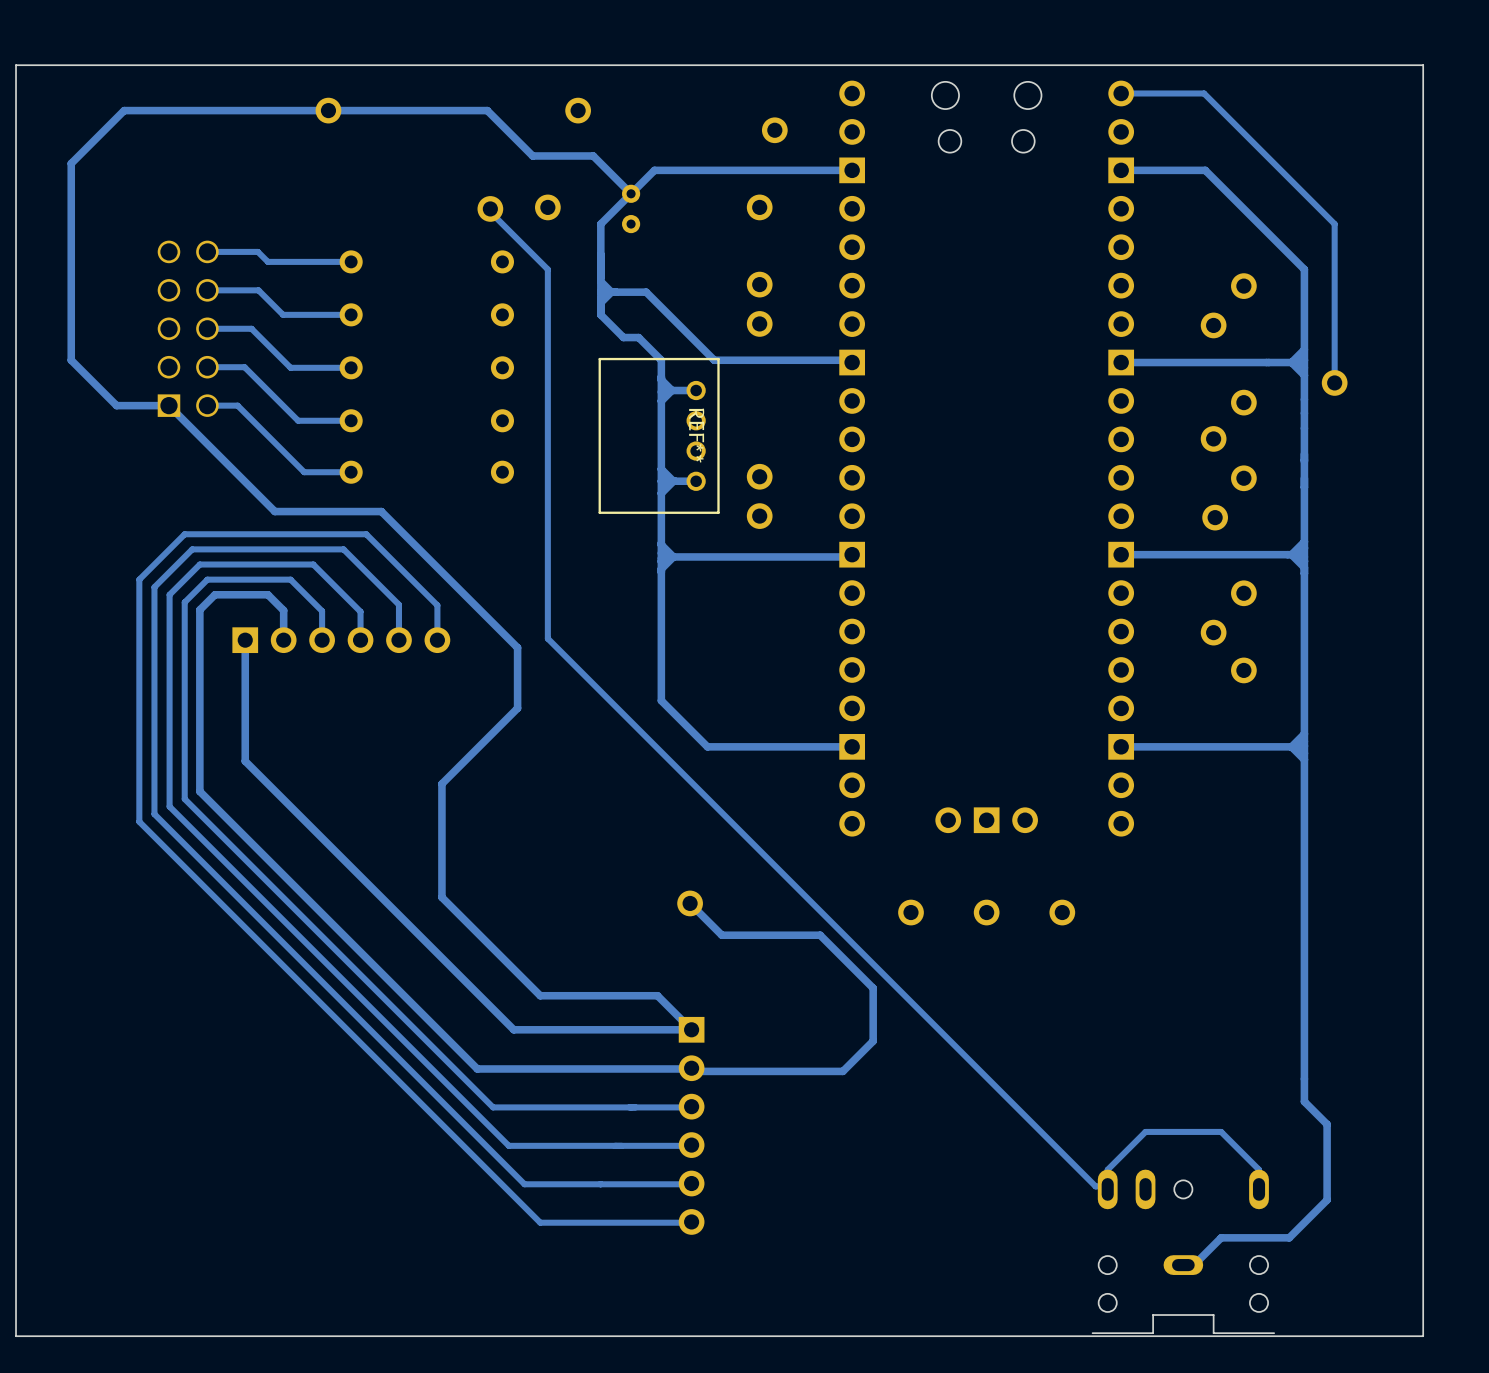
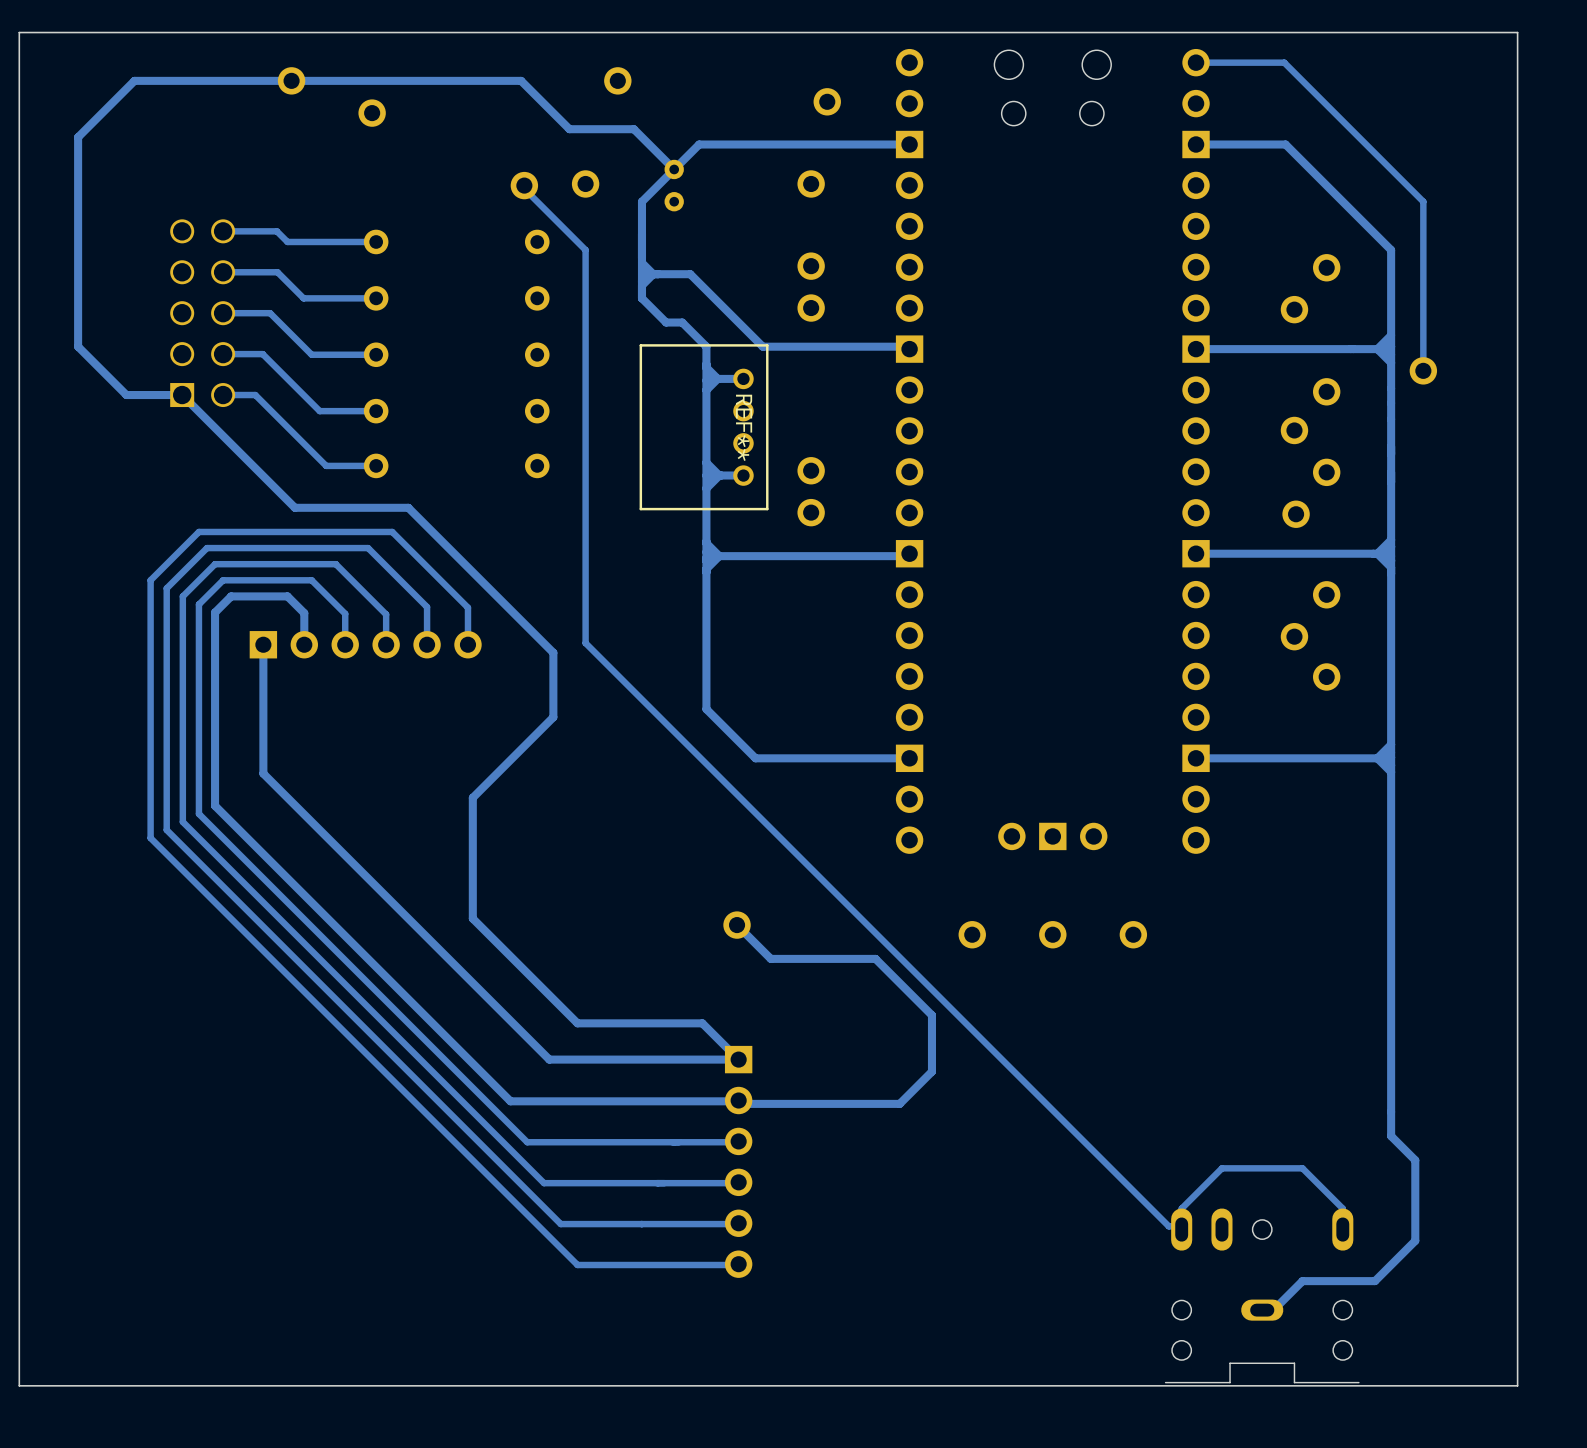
part: none -> (291, 80)
part: (328, 110) -> none
part: none -> (372, 113)

